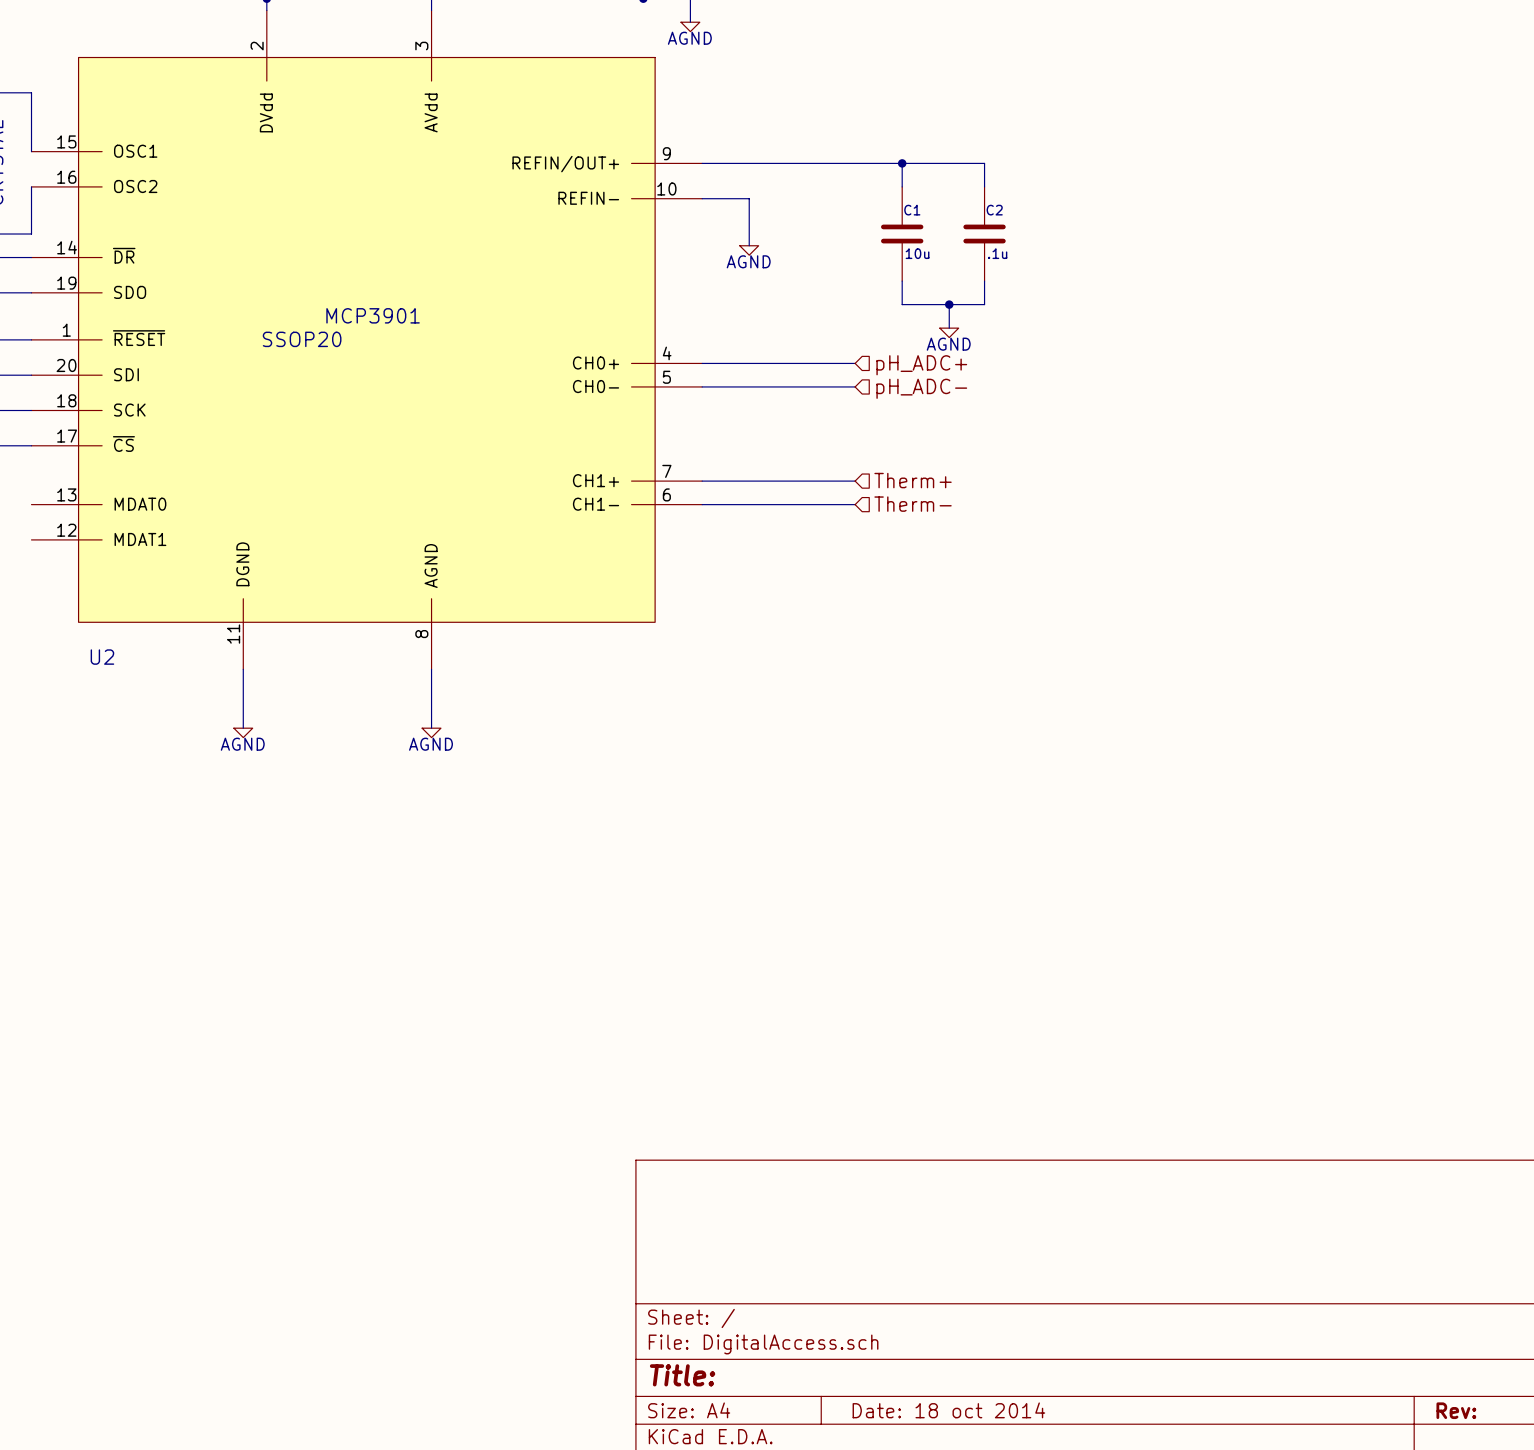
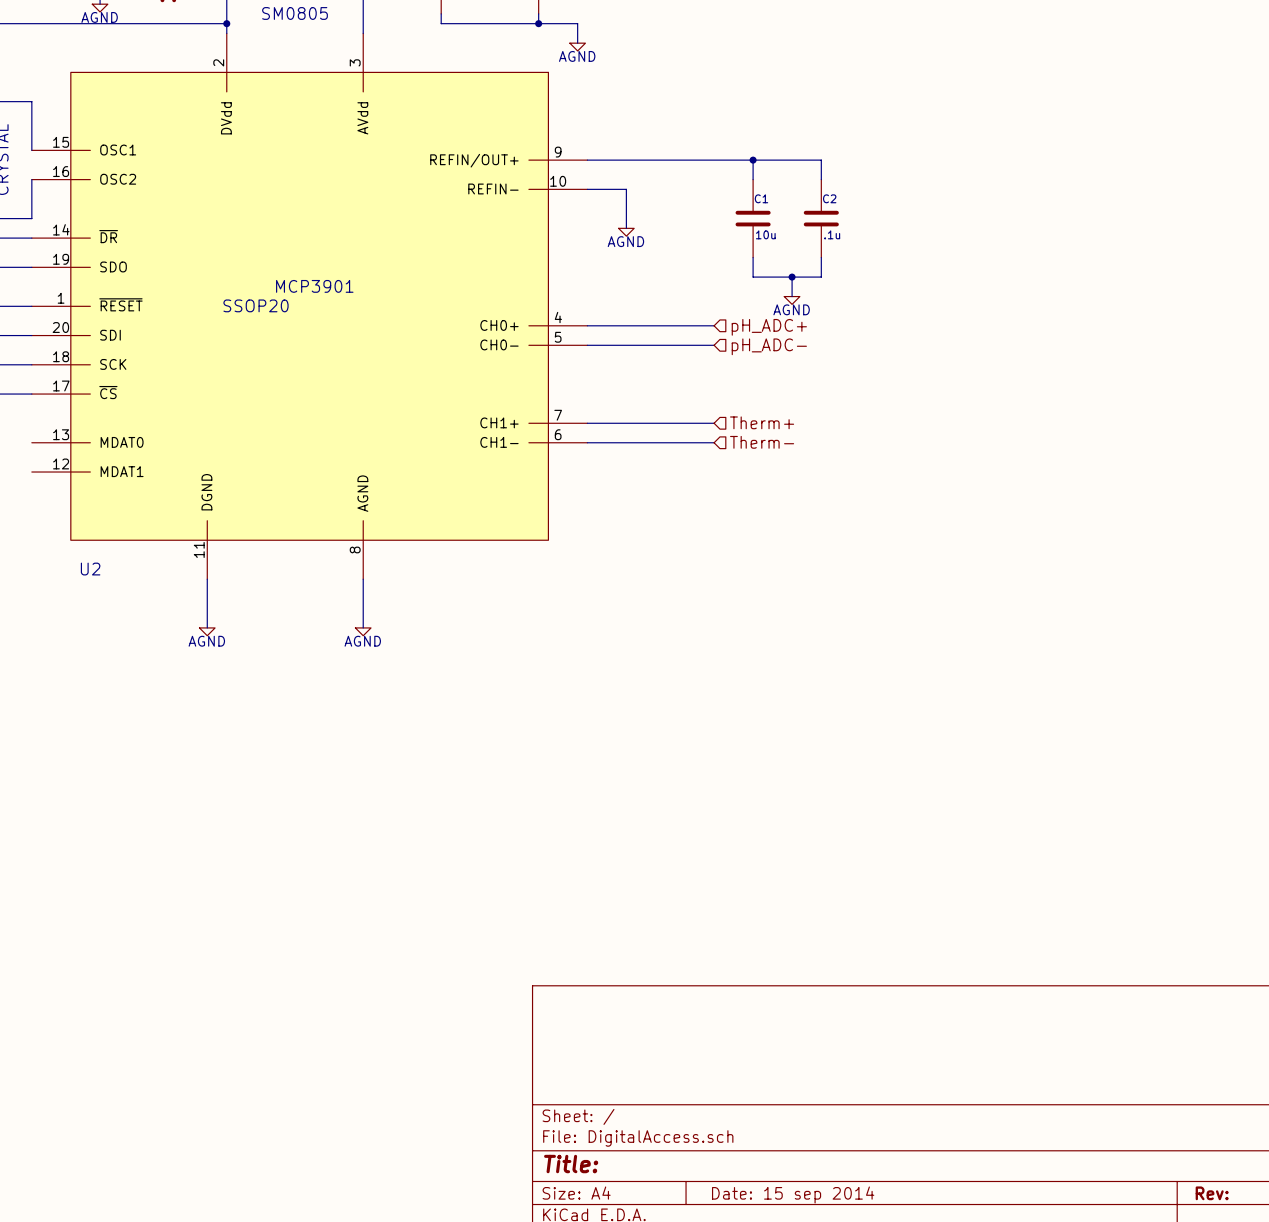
title block: Date: 18 oct 2014 (948, 1410) -> Date: 15 sep 2014 (793, 1194)

